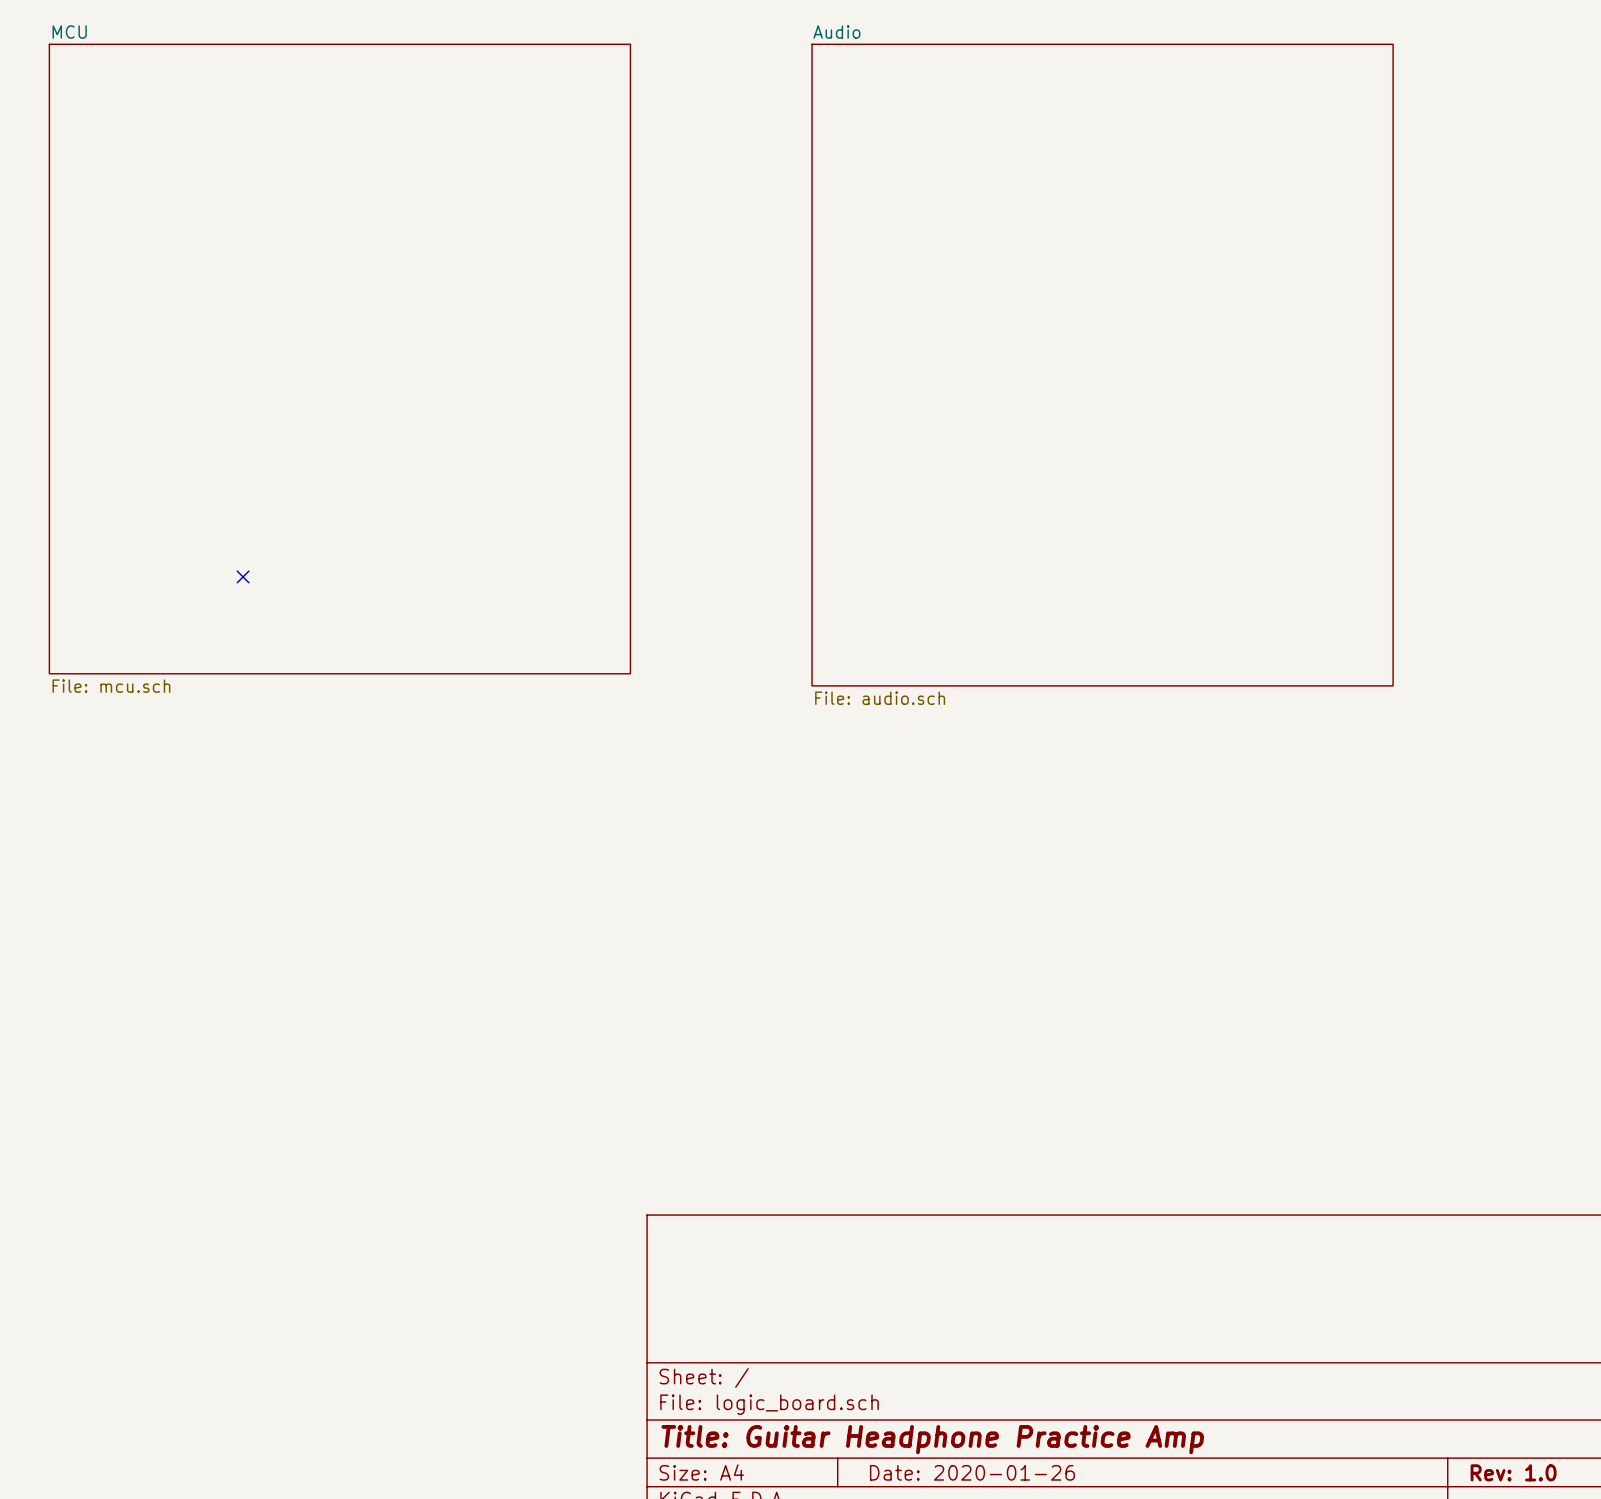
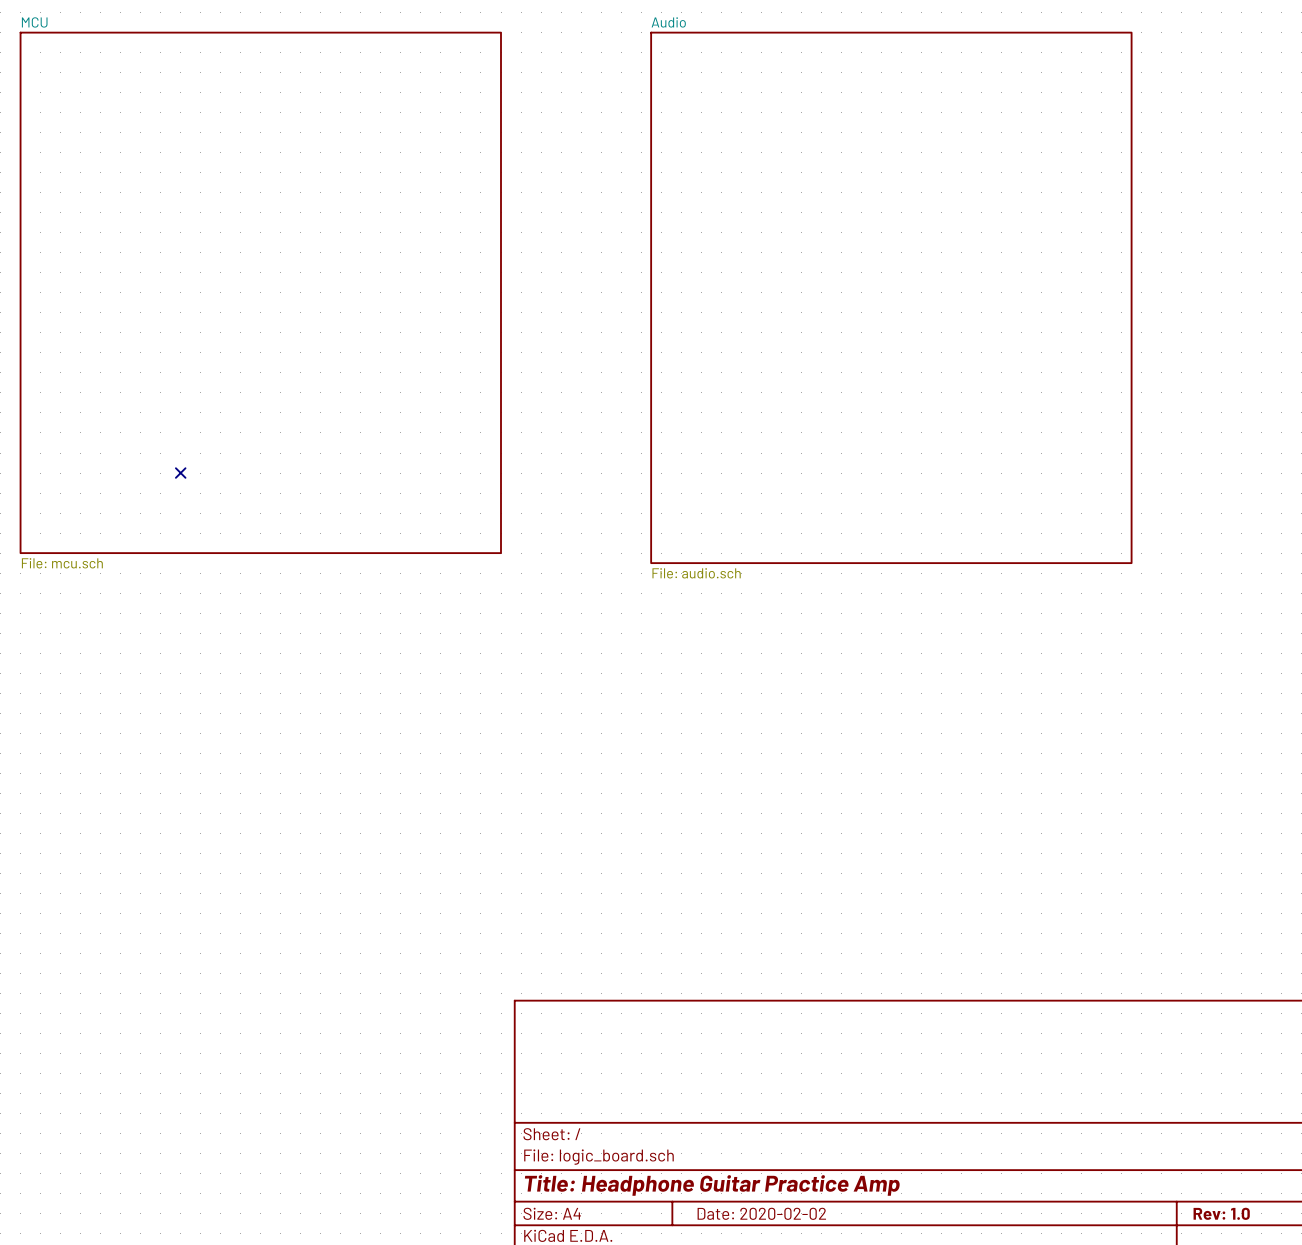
title block: Title: Guitar Headphone Practice Amp (932, 1439) -> Title: Headphone Guitar Practice Amp (712, 1185)
title block: Date: 2020-01-26 (972, 1472) -> Date: 2020-02-02 (761, 1213)

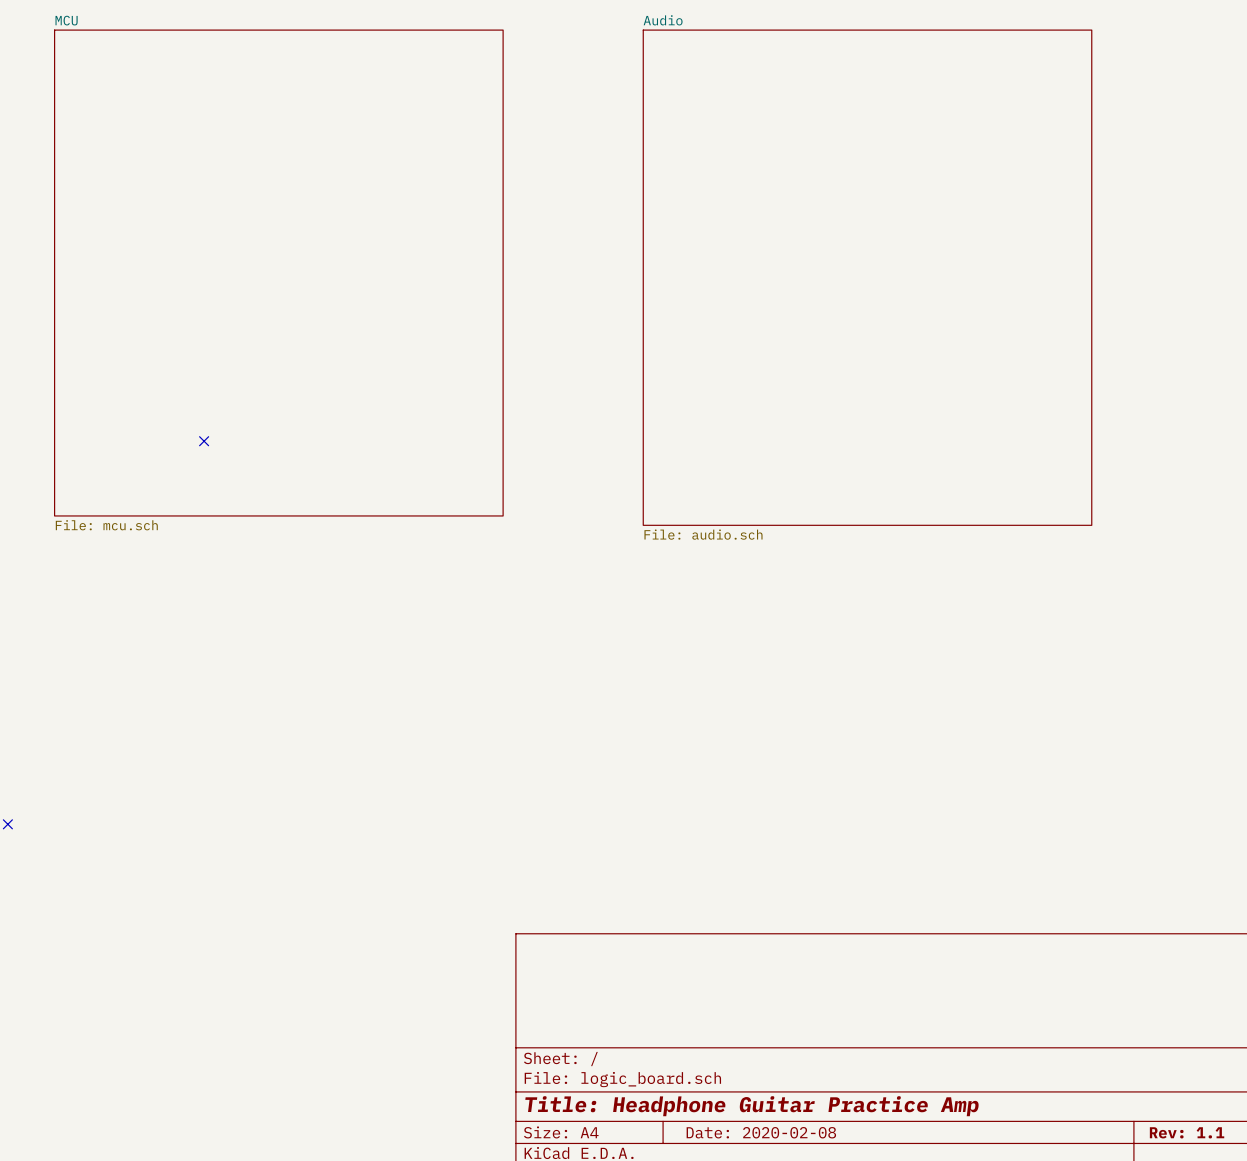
title block: Date: 2020-02-02 (761, 1213) -> Date: 2020-02-08 (761, 1132)
title block: Rev: 1.0 (1221, 1213) -> Rev: 1.1 (1187, 1132)

